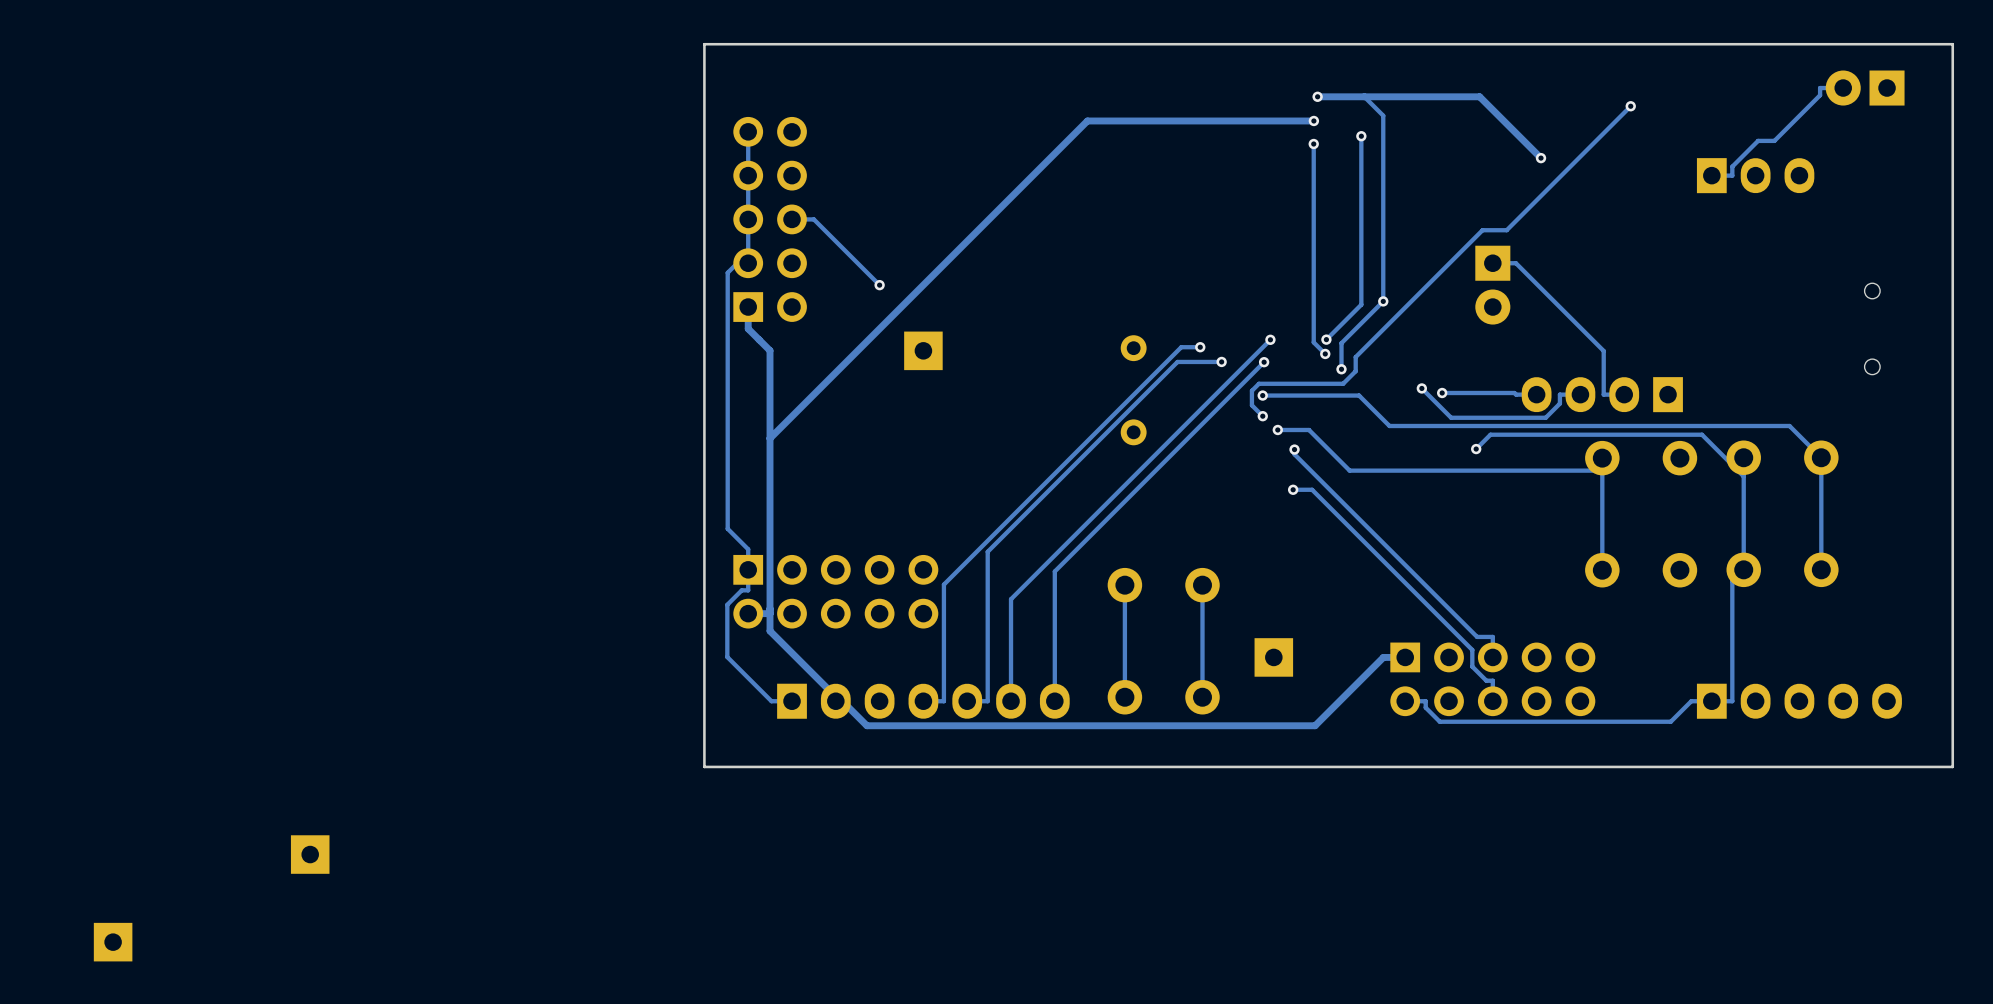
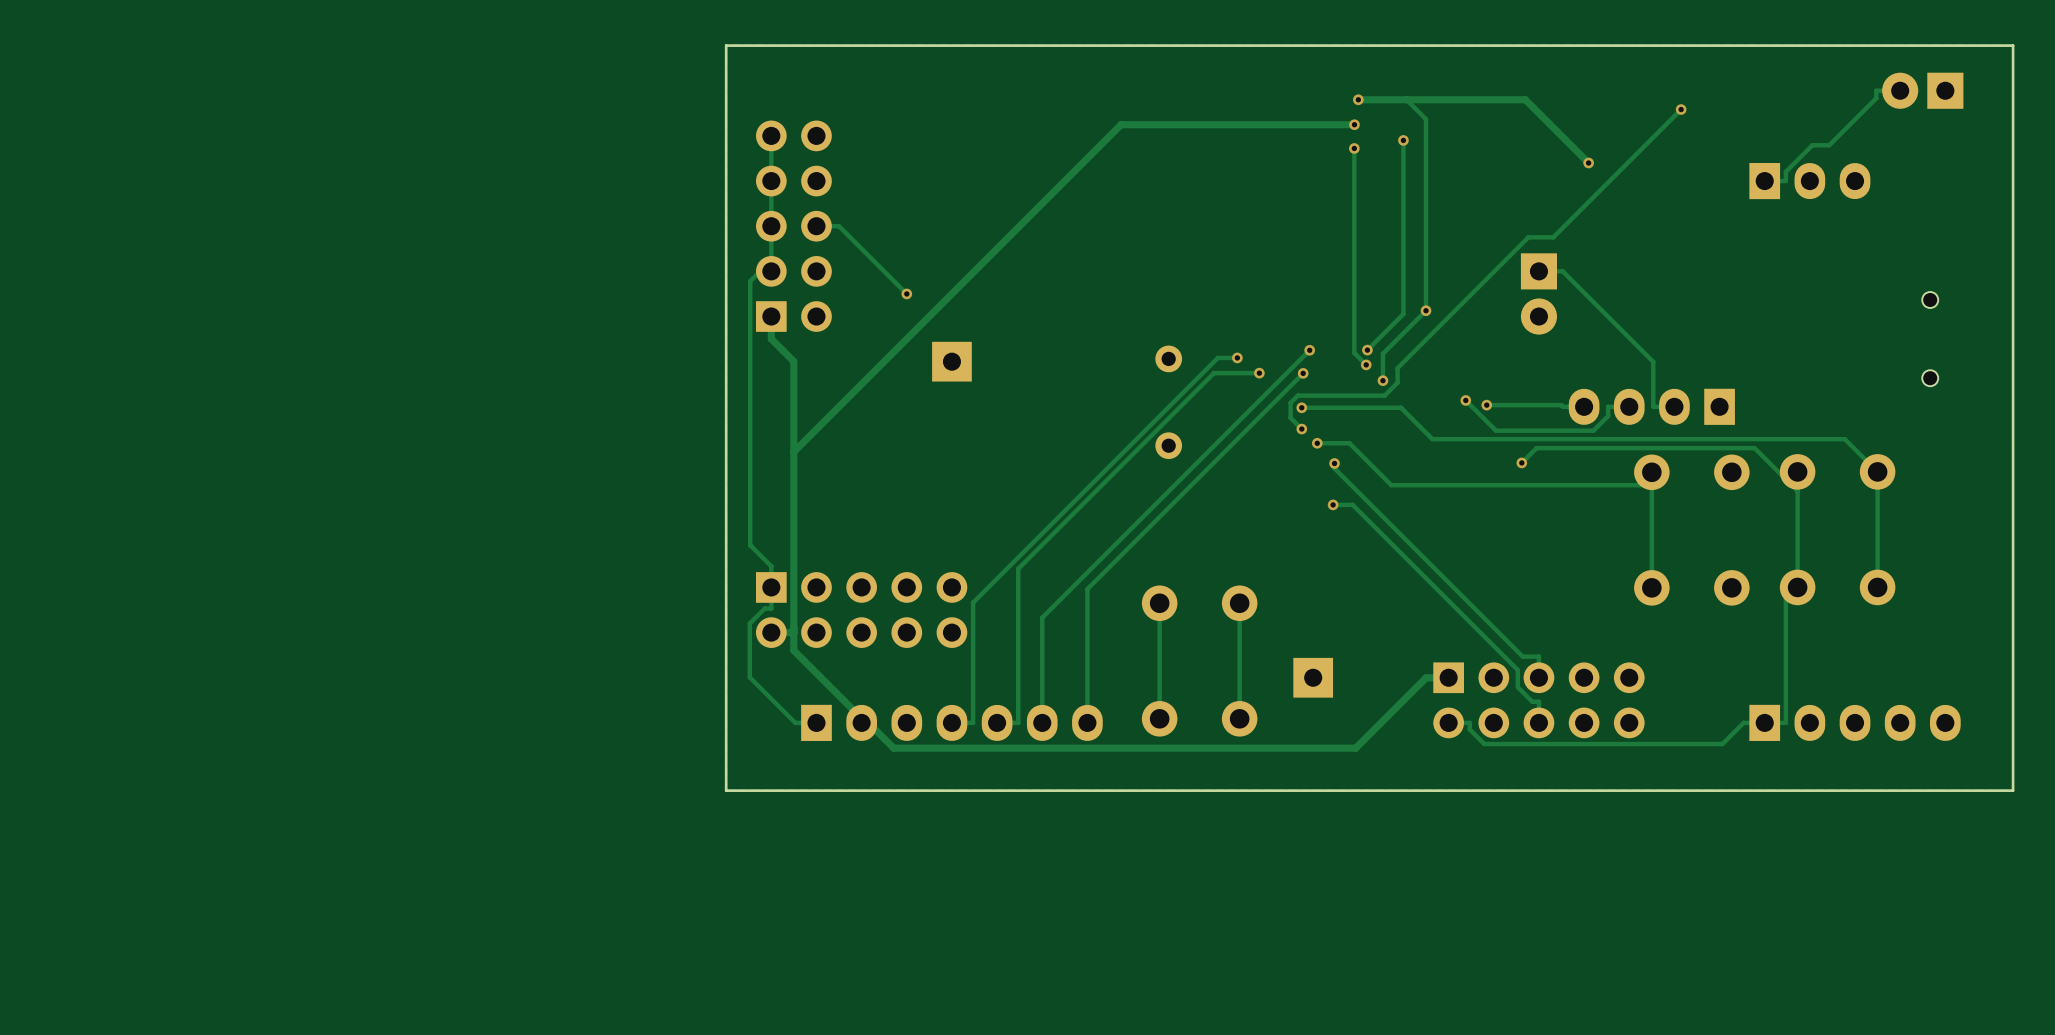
part: (310, 854) -> none
part: (113, 942) -> none

